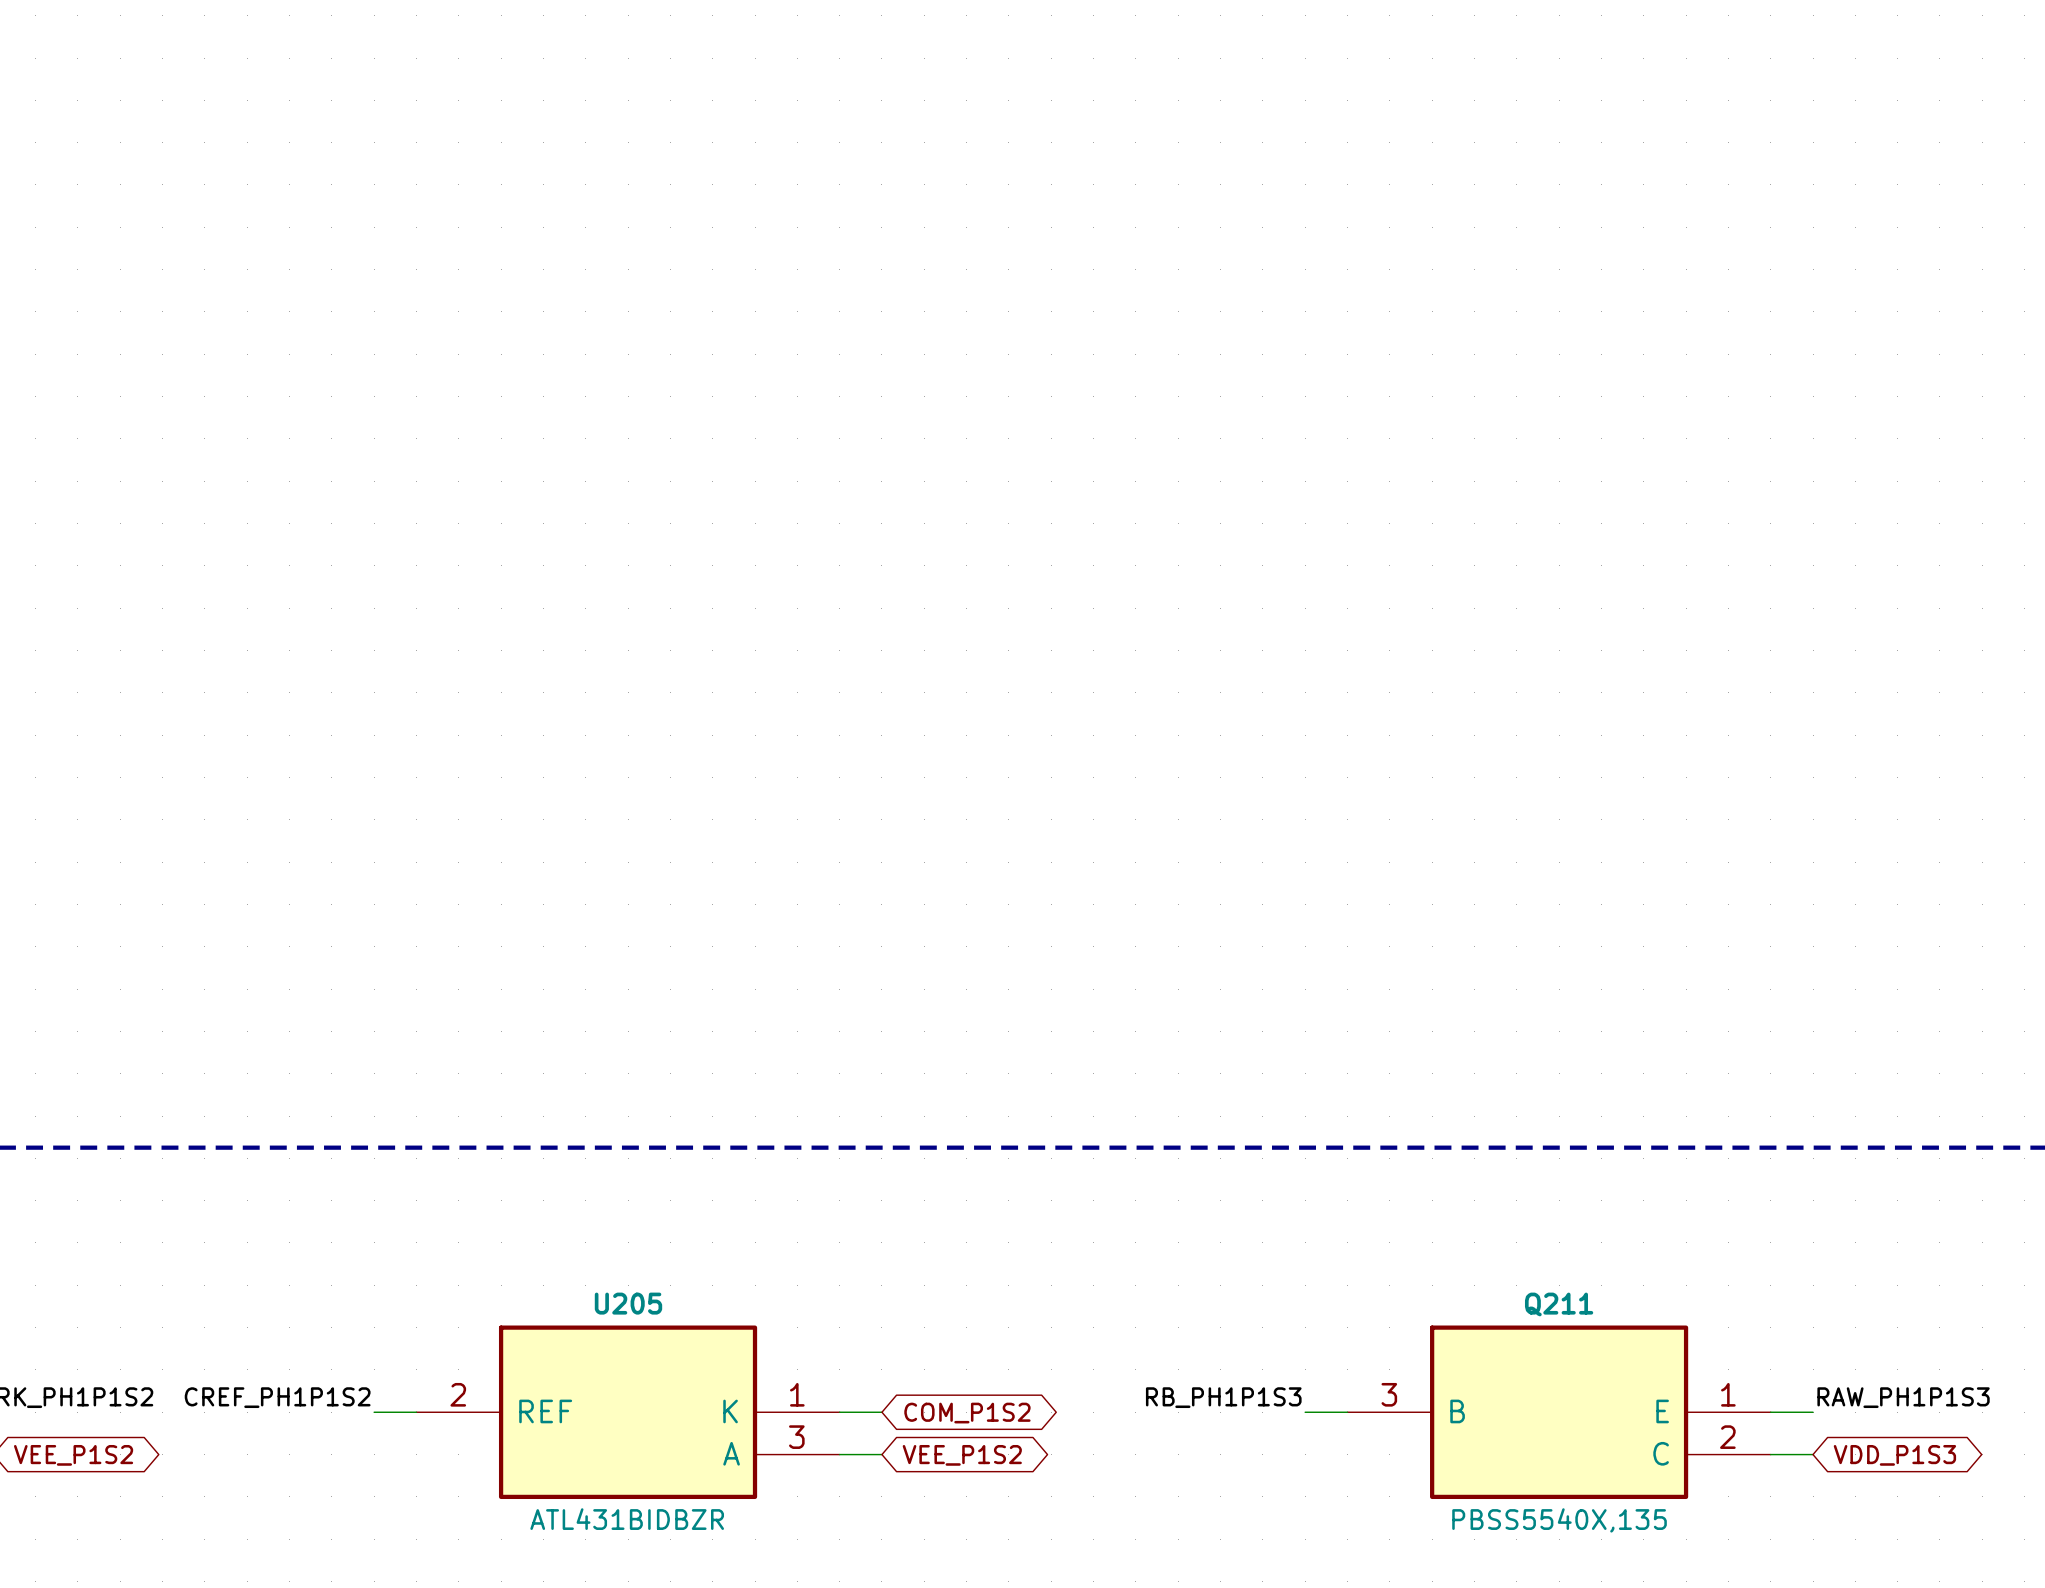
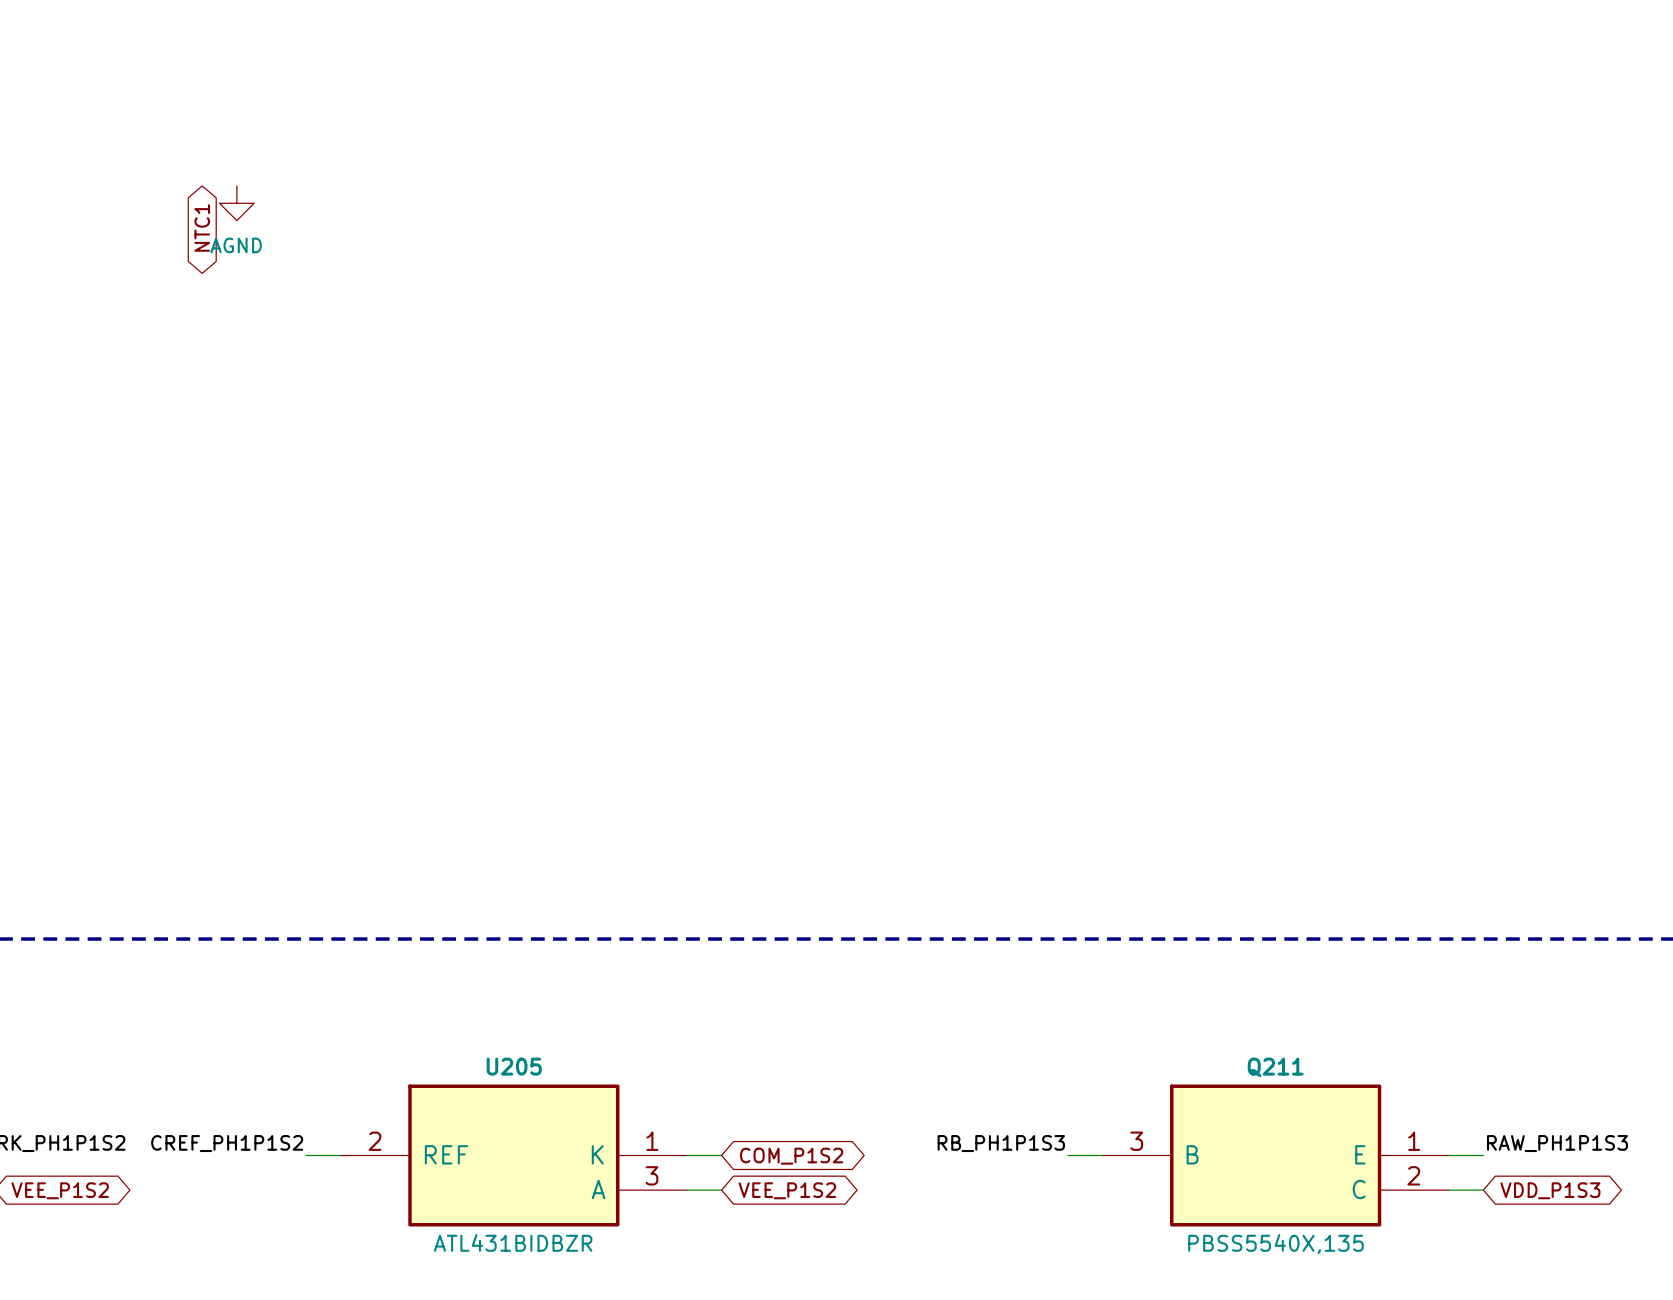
power symbol: none -> AGND (236, 203)
global label: none -> NTC1 (202, 227)

